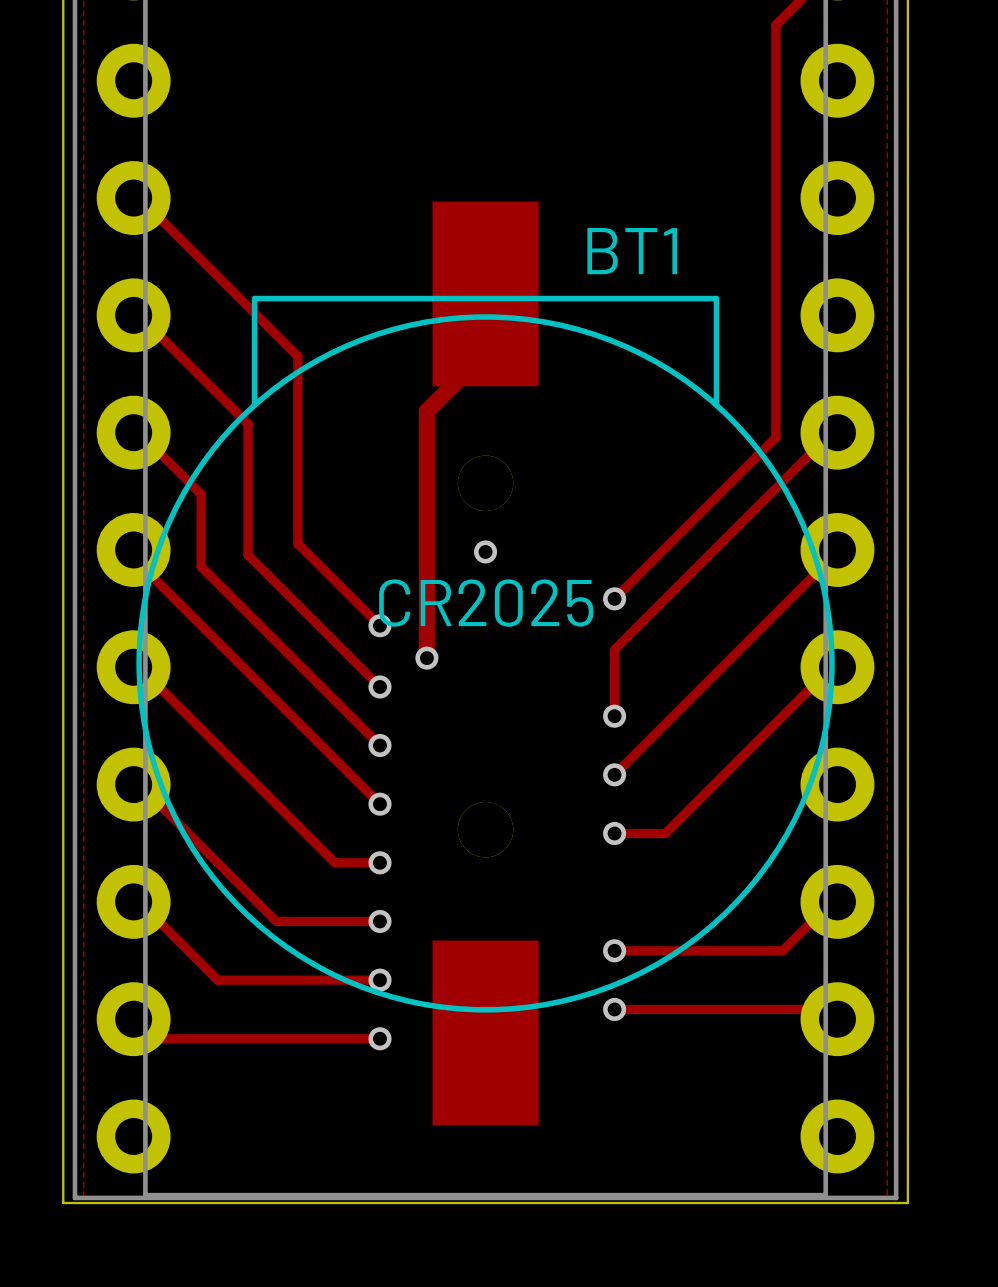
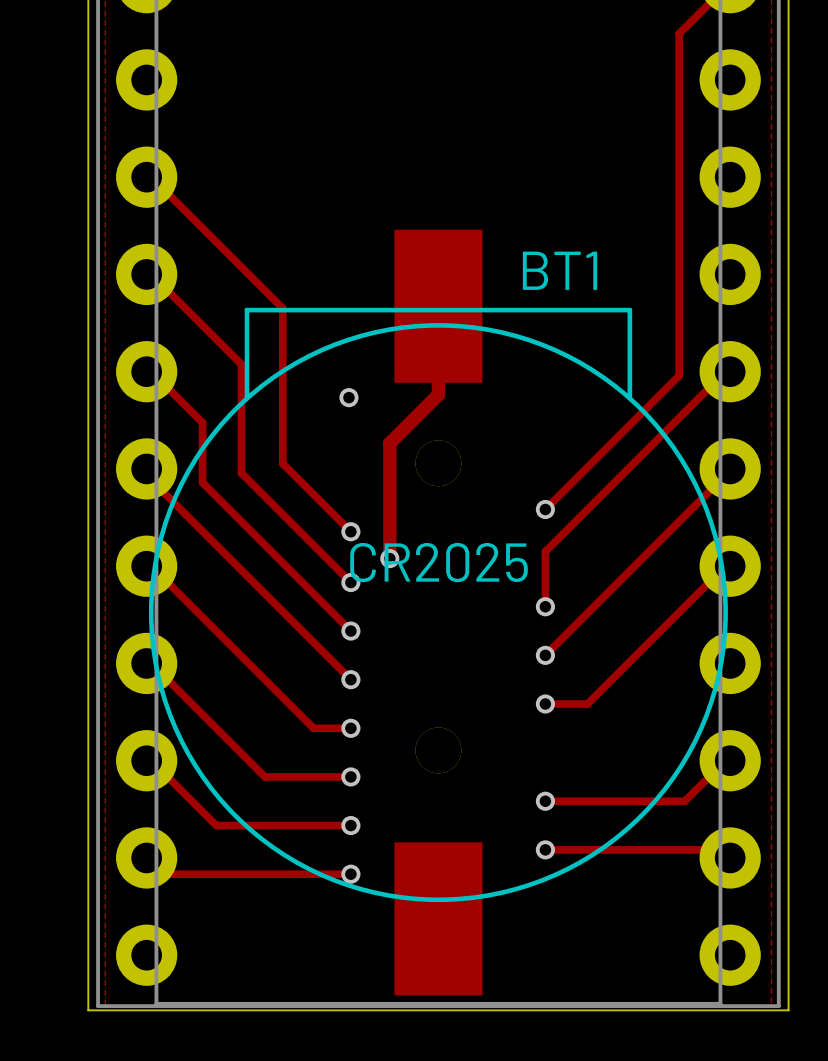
track: (485, 352) (426, 411) (426, 519) -> (438, 305) (438, 394) (389, 443)
via position: (485, 551) -> (348, 397)
BT1 position: (485, 663) -> (438, 612)

